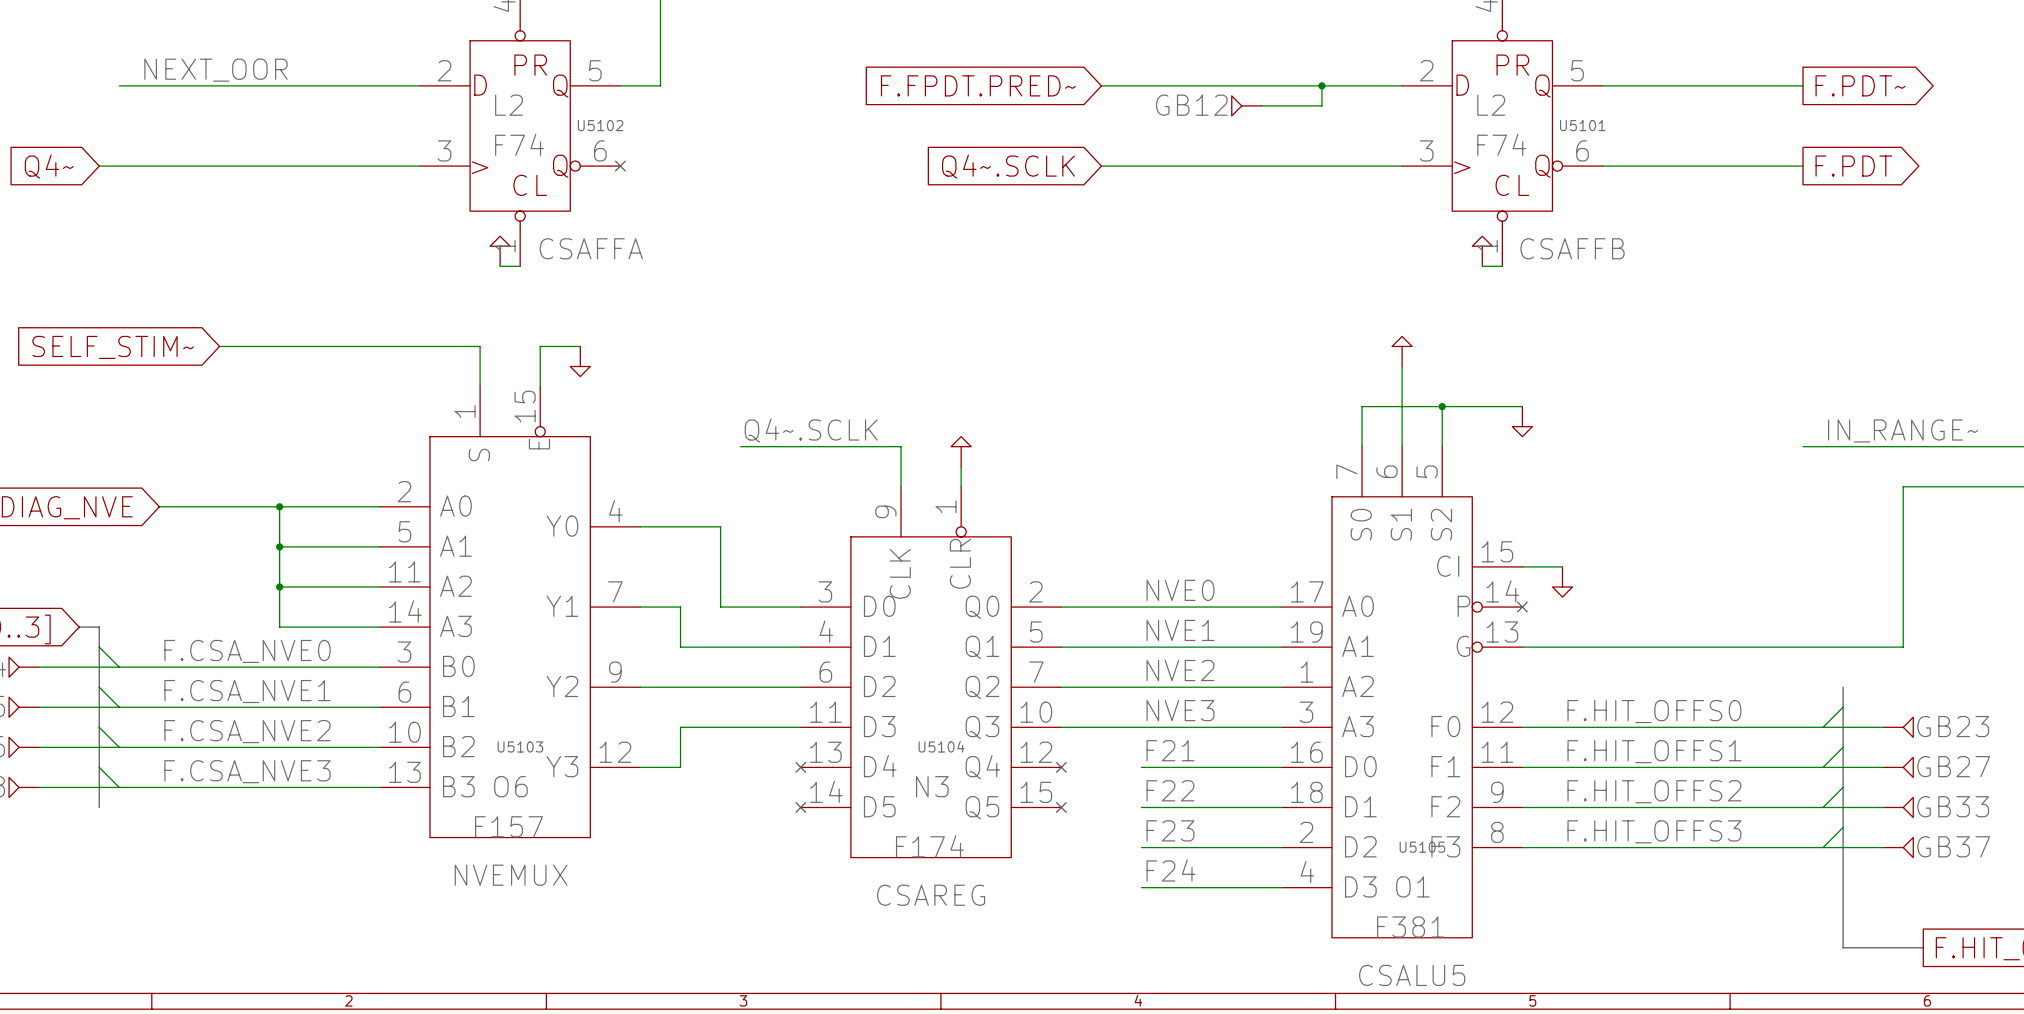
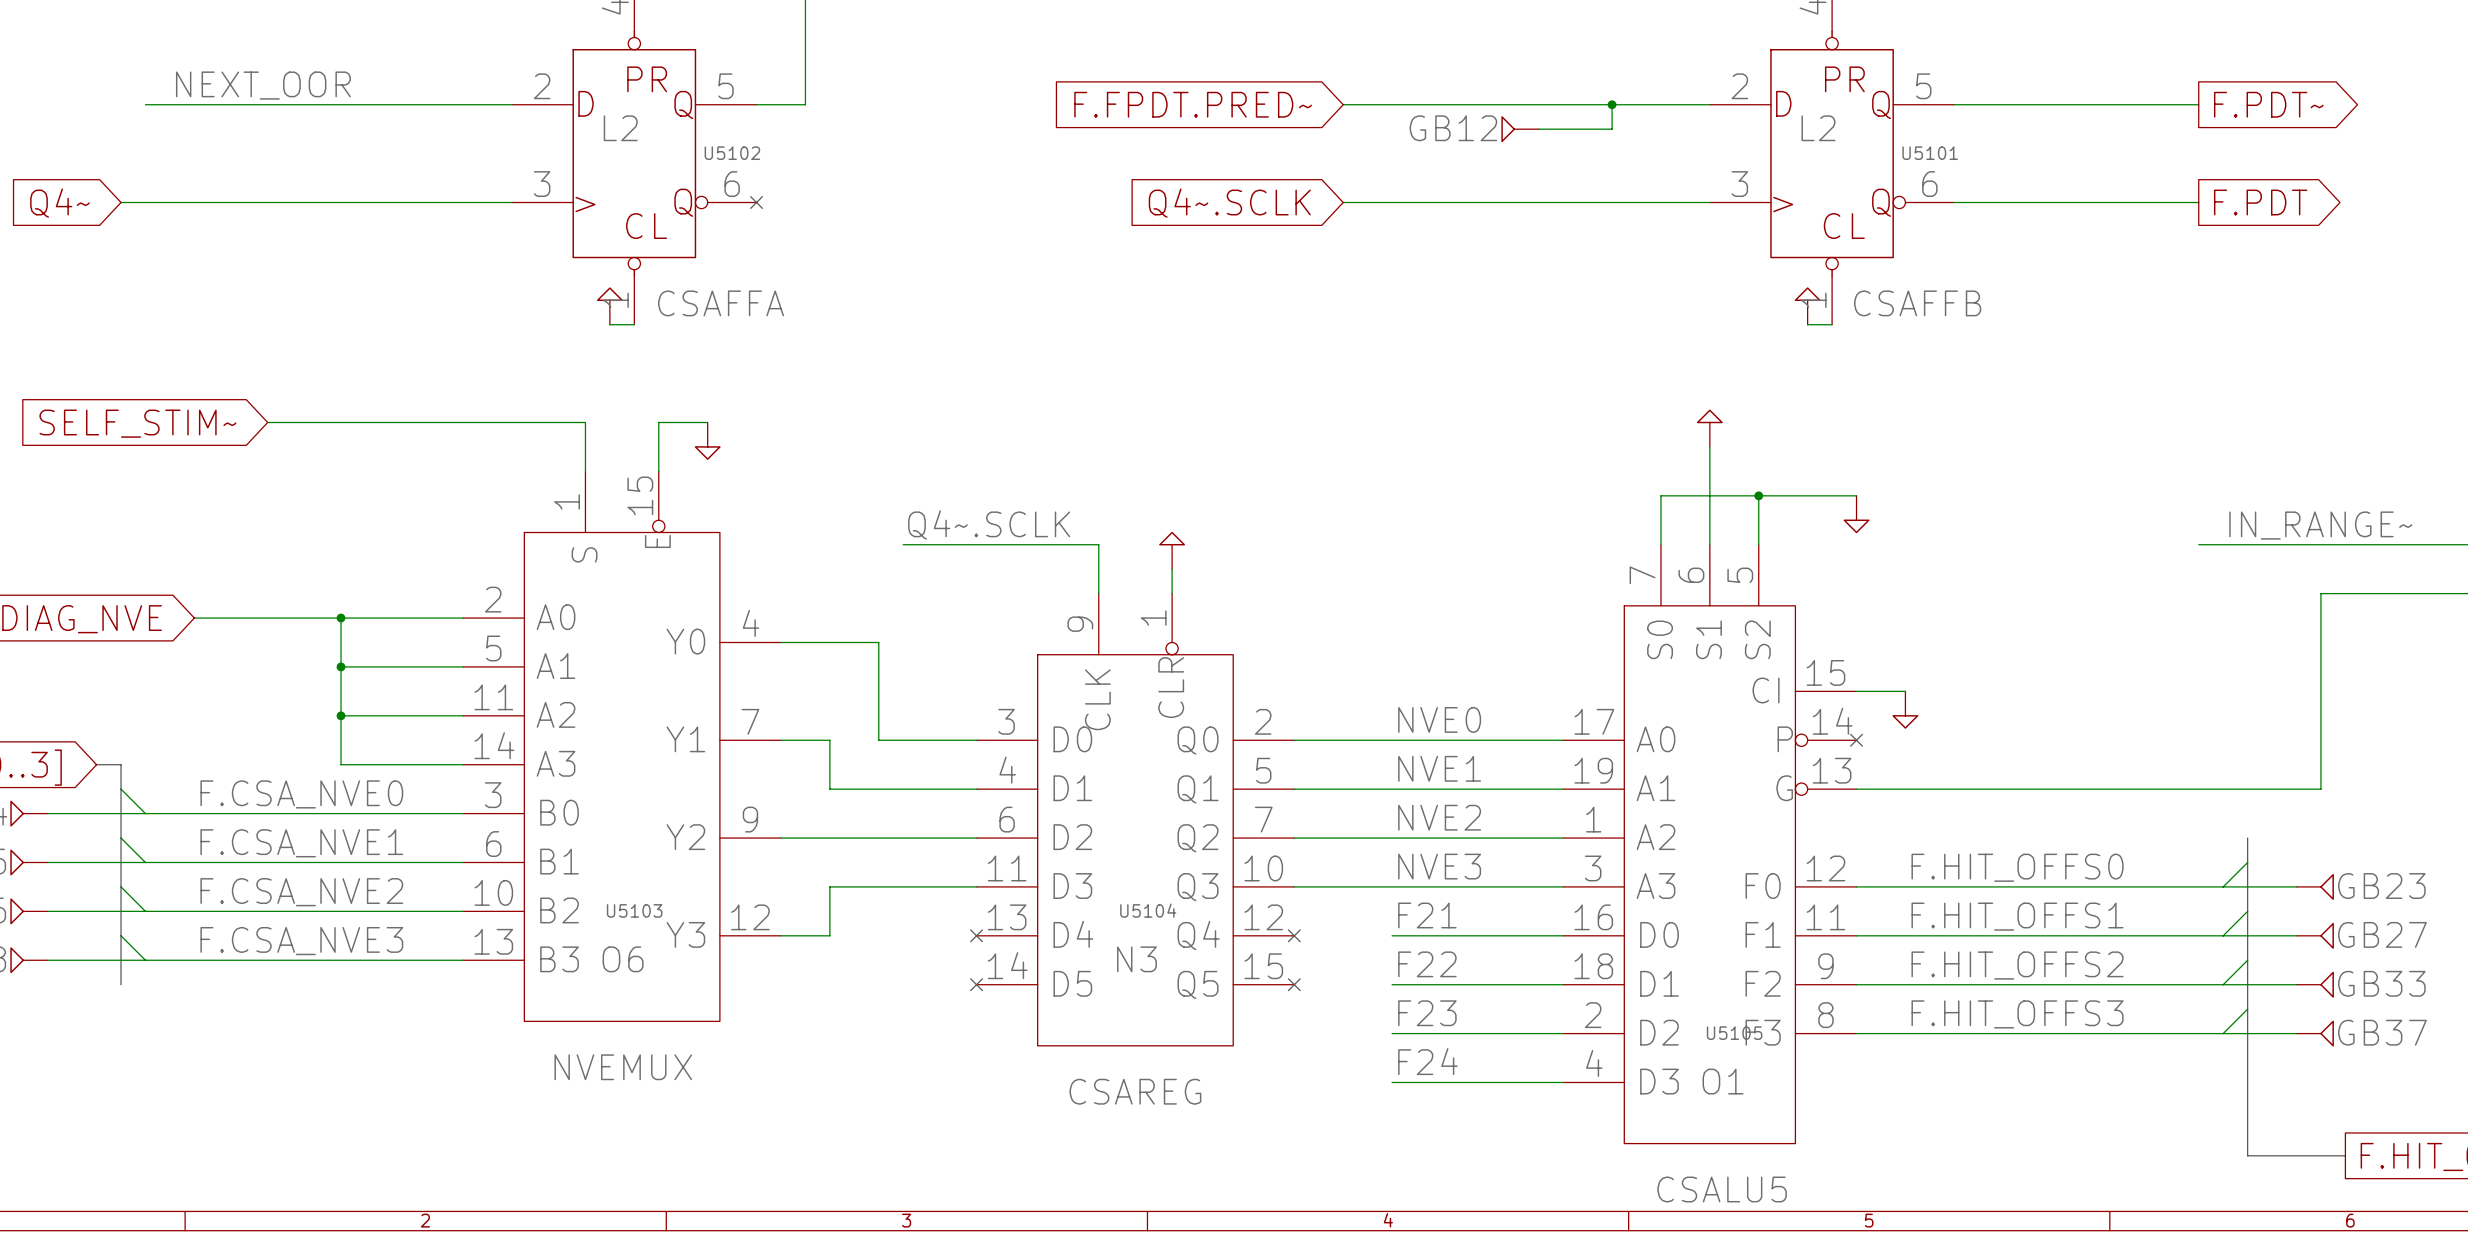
U5102 value: F74 (519, 144) -> none
U5101 value: F74 (1501, 144) -> none
U5103 value: F157 (509, 826) -> none
U5104 value: F174 (929, 846) -> none
U5105 value: F381 (1410, 927) -> none

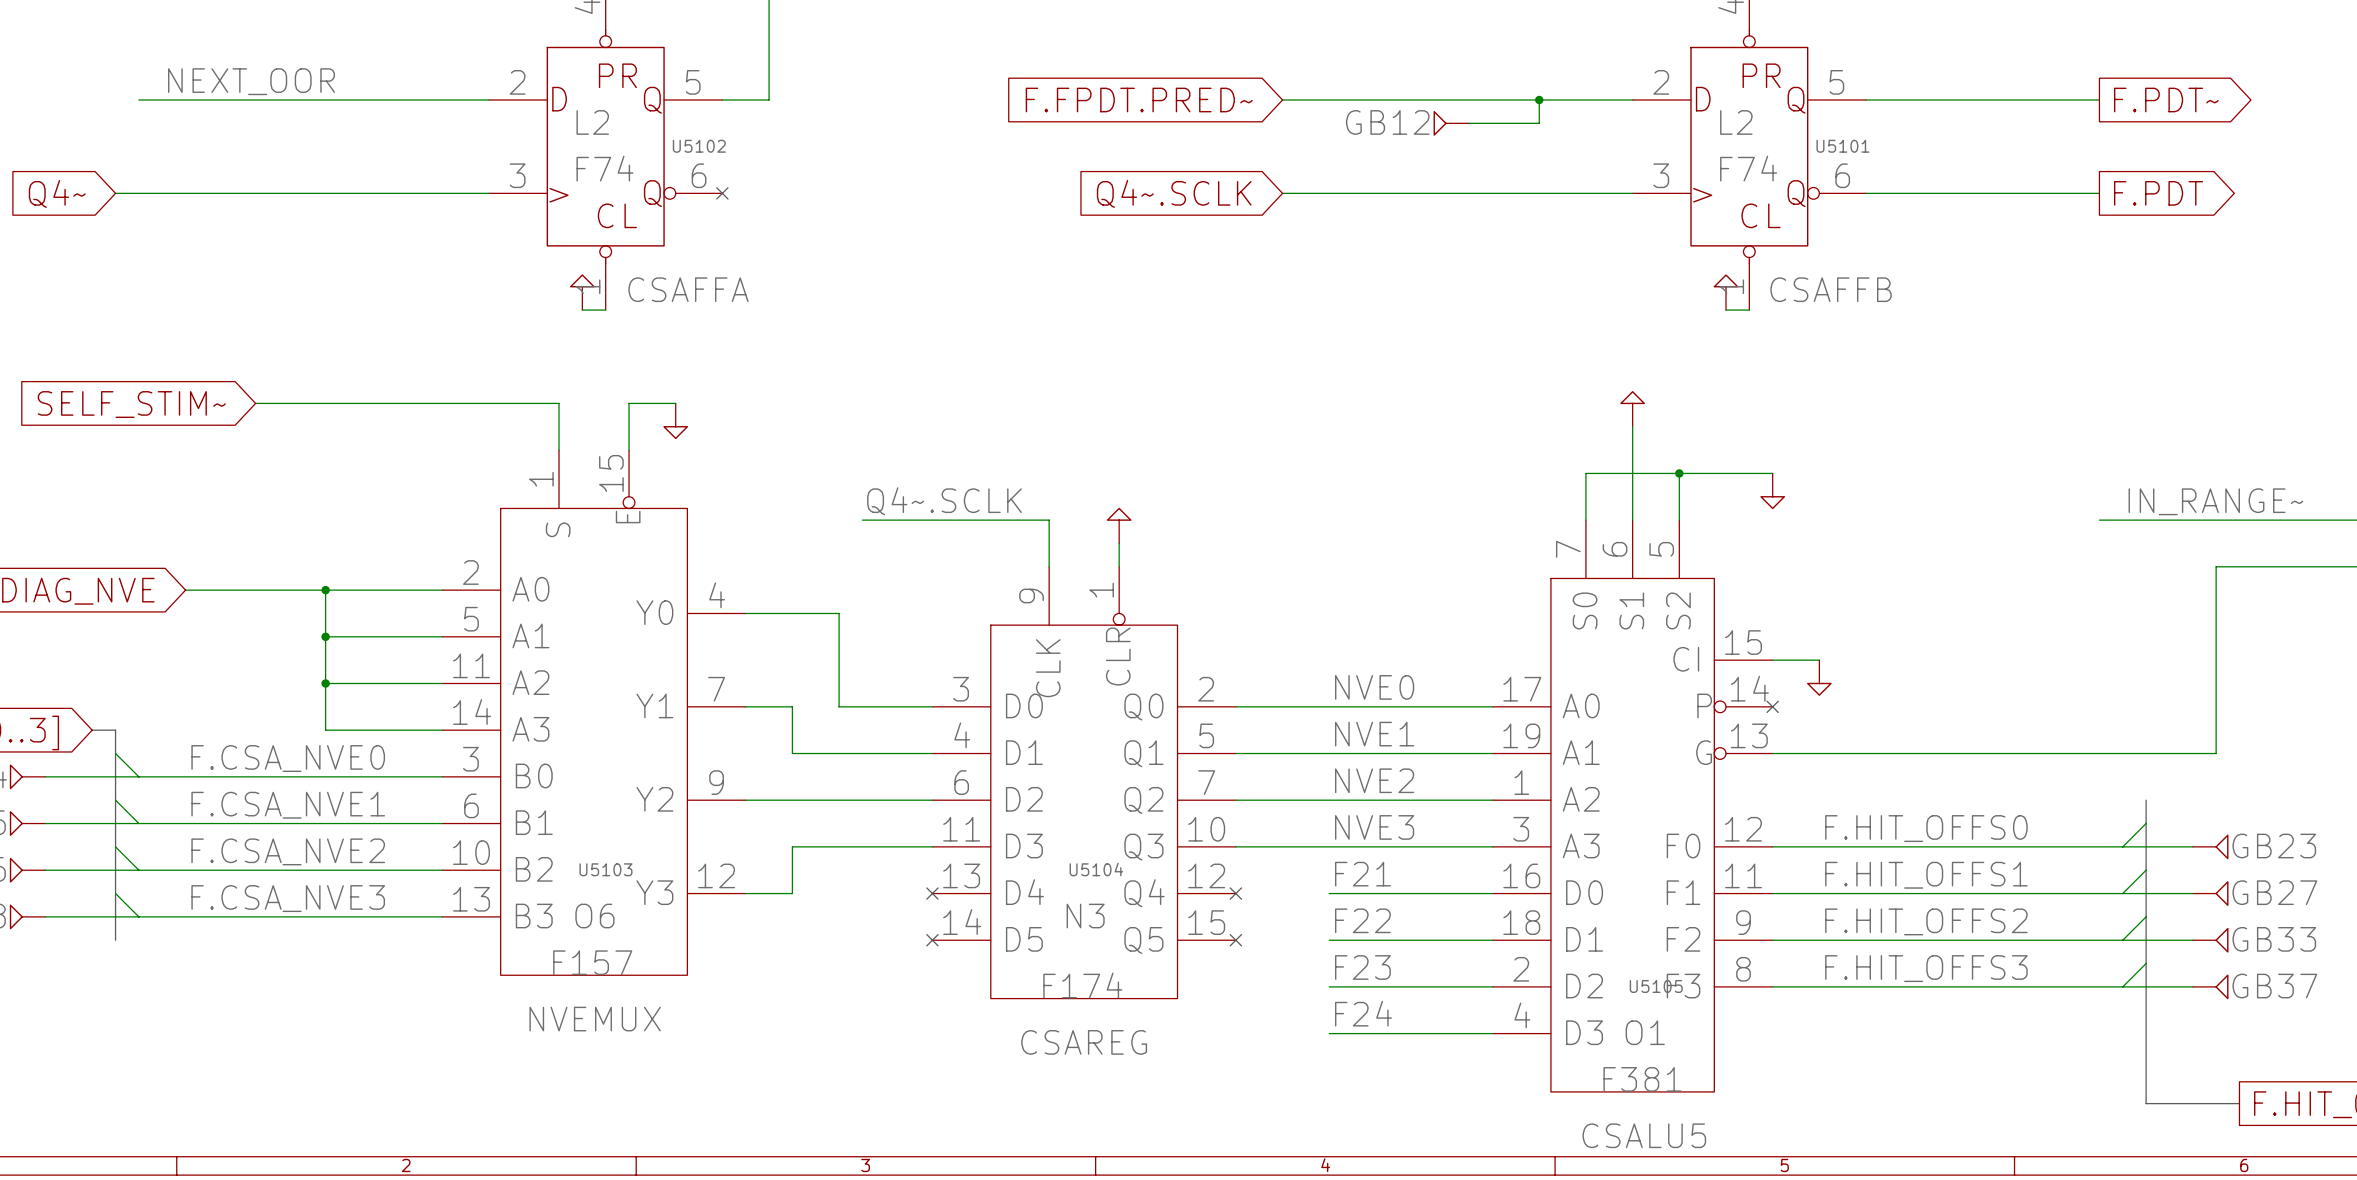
U5102 value: none -> F74 (604, 168)
U5101 value: none -> F74 (1748, 168)
U5103 value: none -> F157 (592, 962)
U5104 value: none -> F174 (1082, 985)
U5105 value: none -> F381 (1642, 1079)

